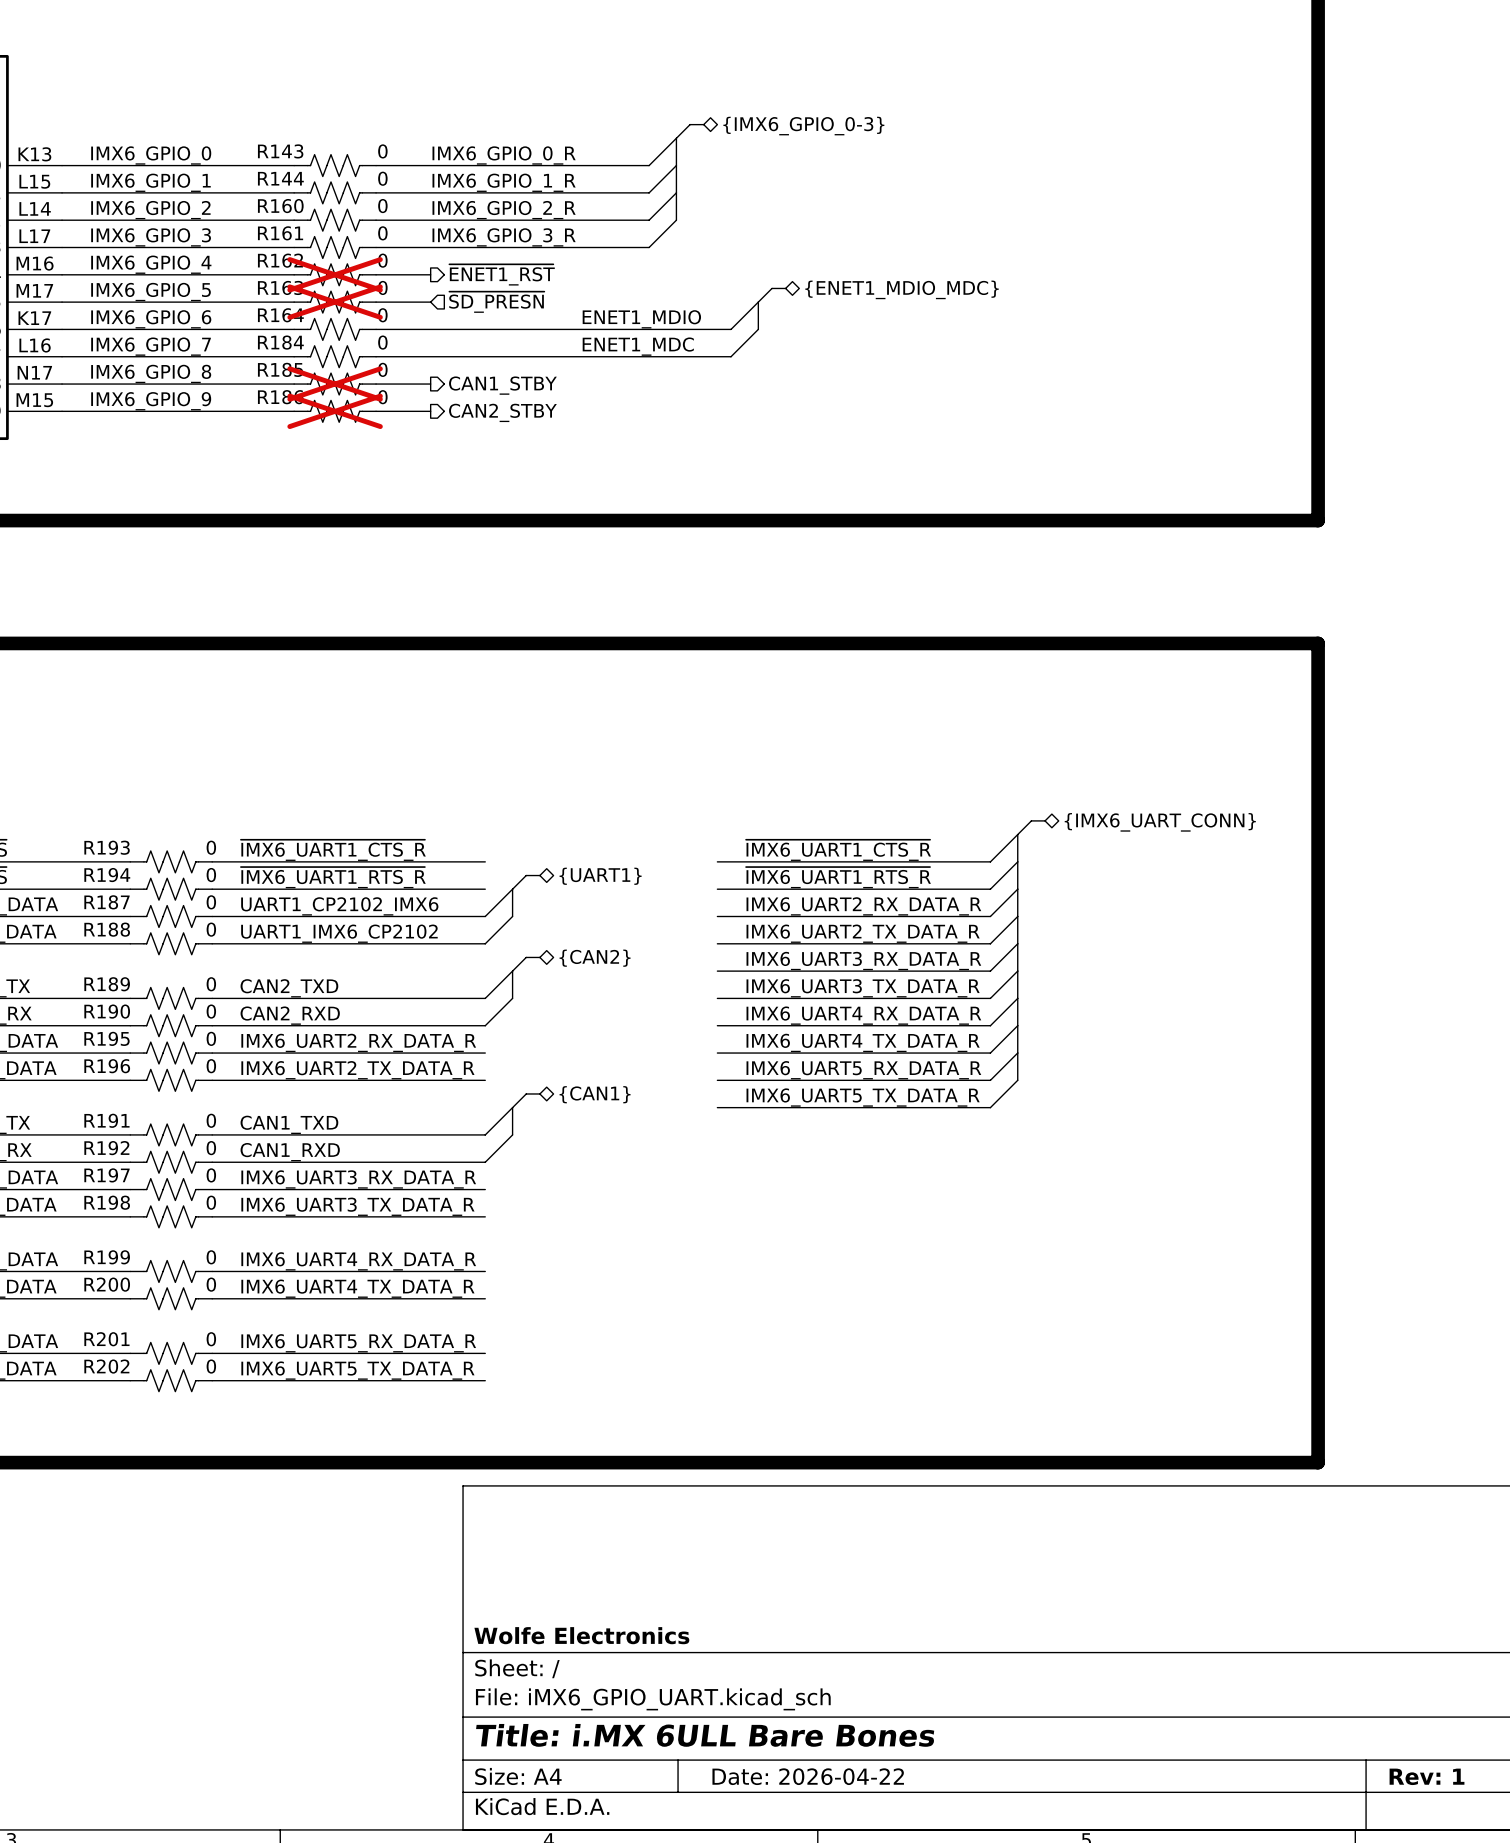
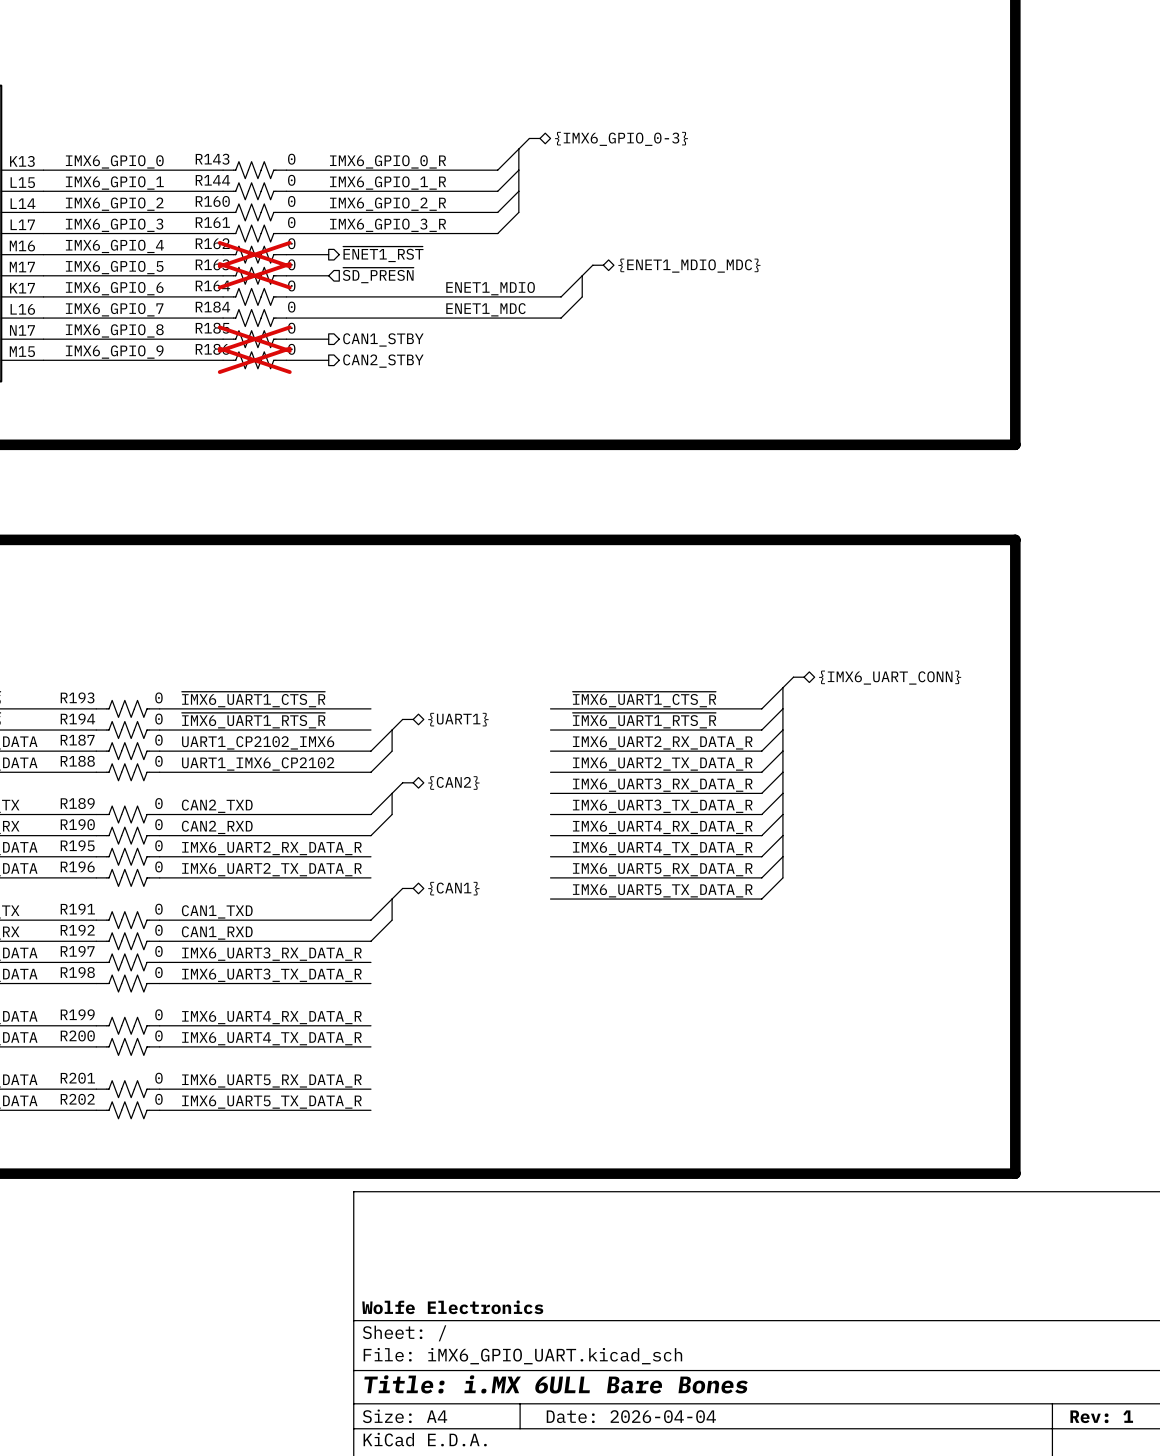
title block: Date: 2026-04-22 (808, 1776) -> Date: 2026-04-04 (631, 1416)

